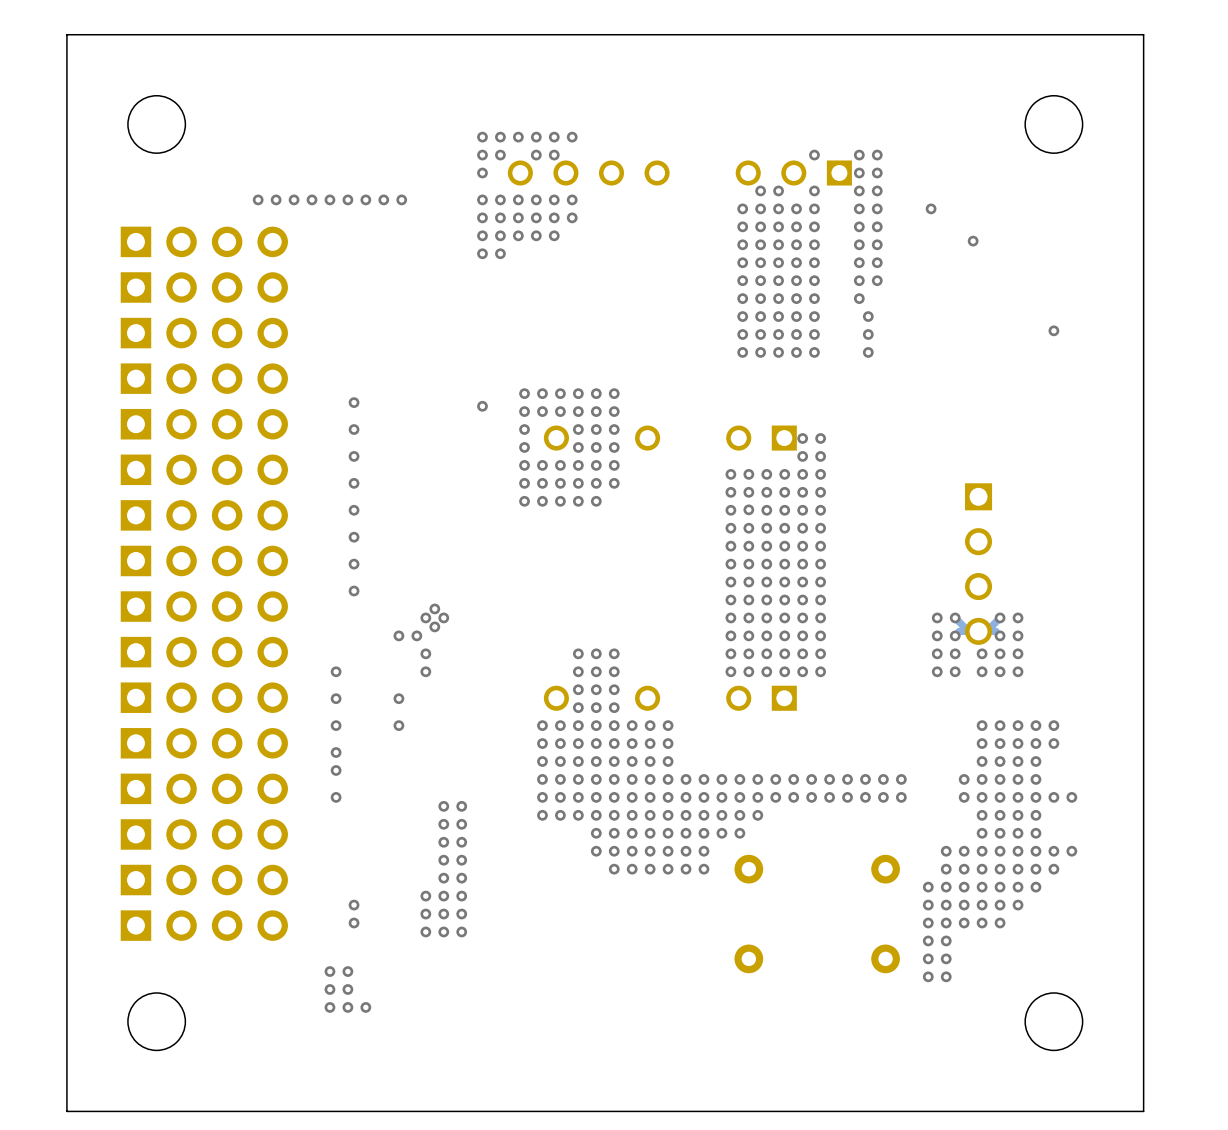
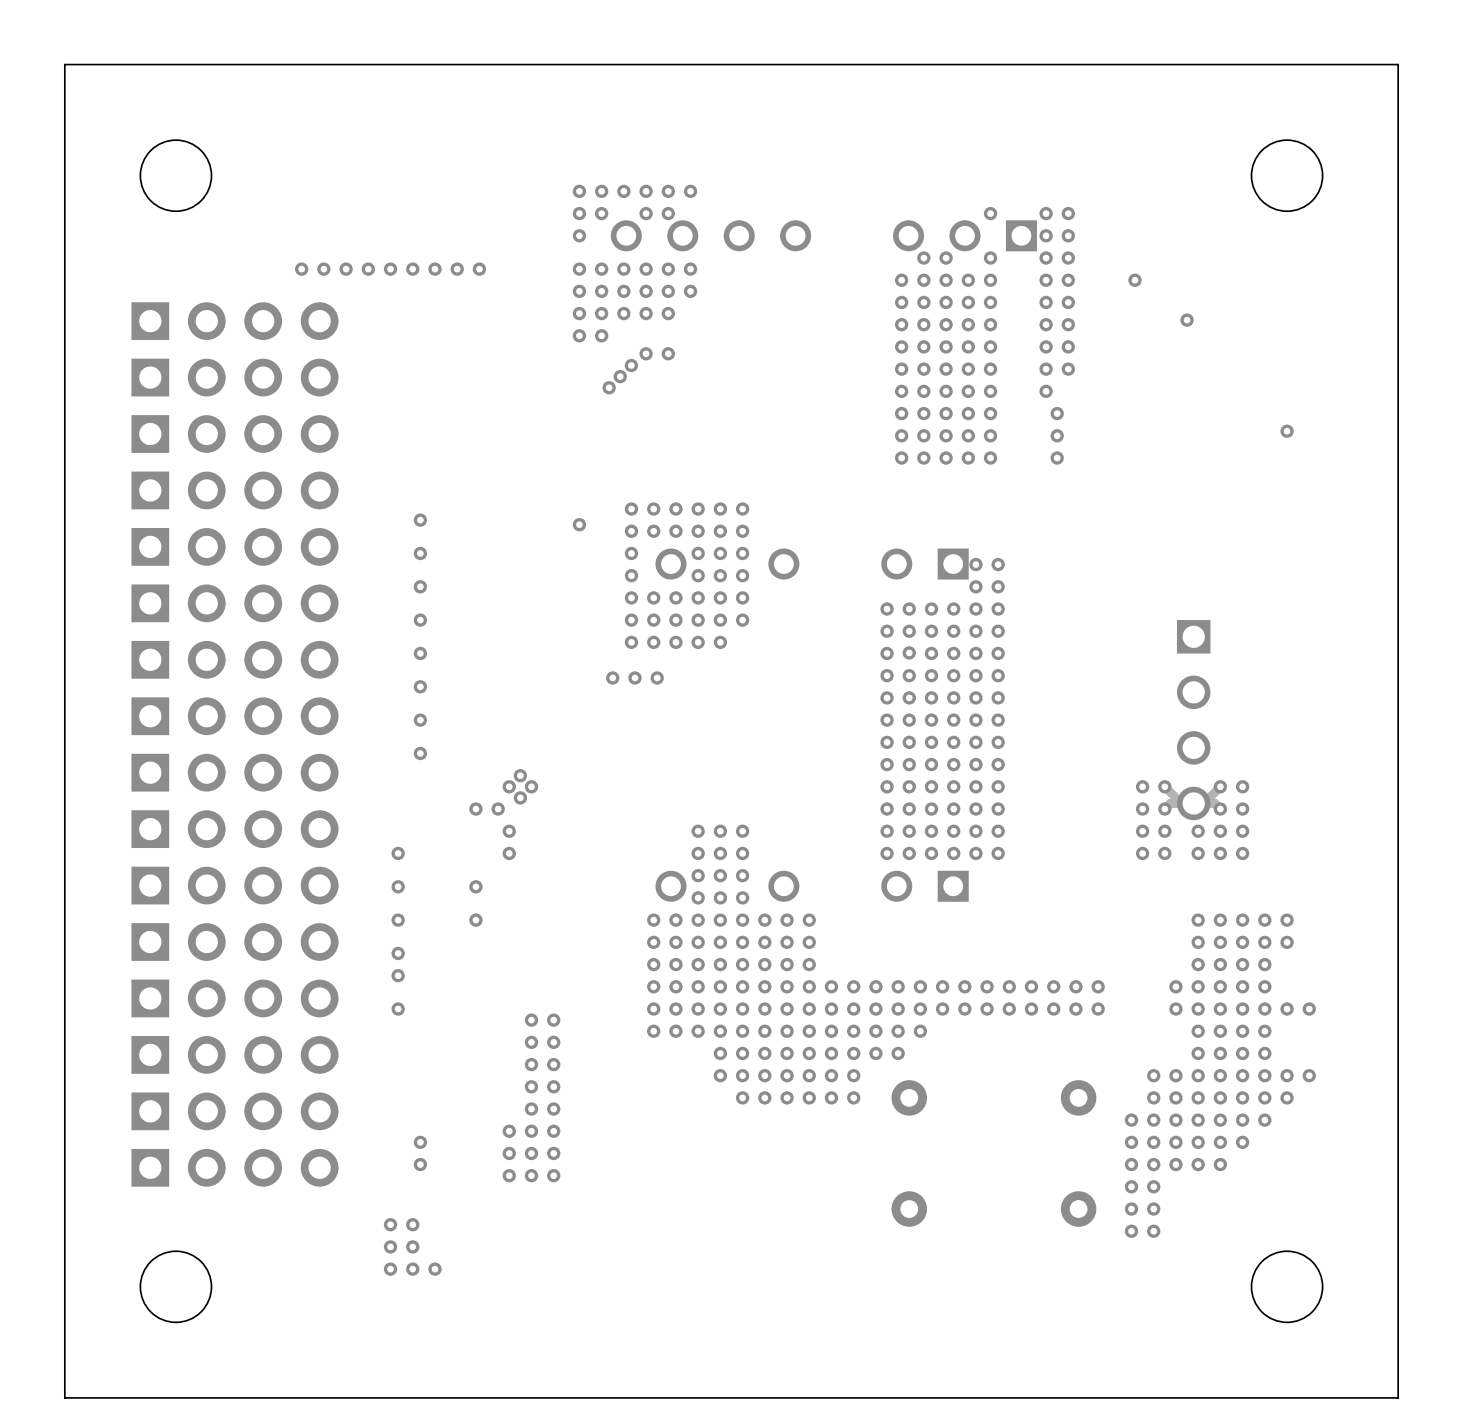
via: none -> (646, 353)
via: none -> (668, 353)
via: none -> (631, 365)
via: none -> (620, 376)
via: none -> (609, 387)
via: none -> (612, 677)
via: none -> (634, 677)
via: none -> (657, 677)

